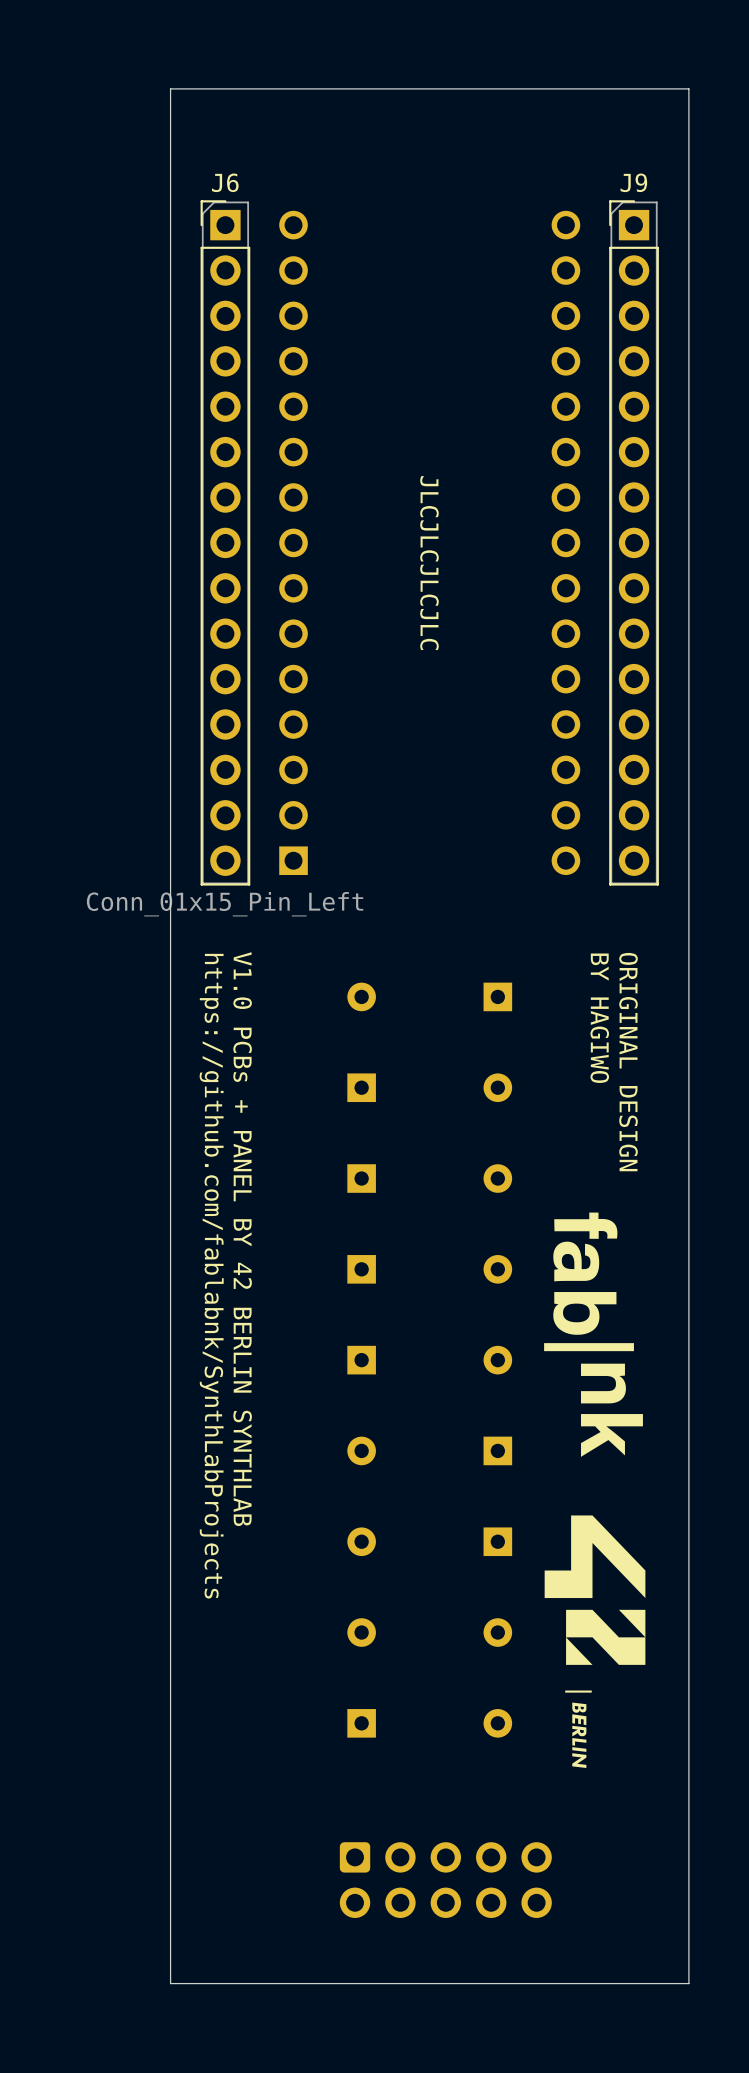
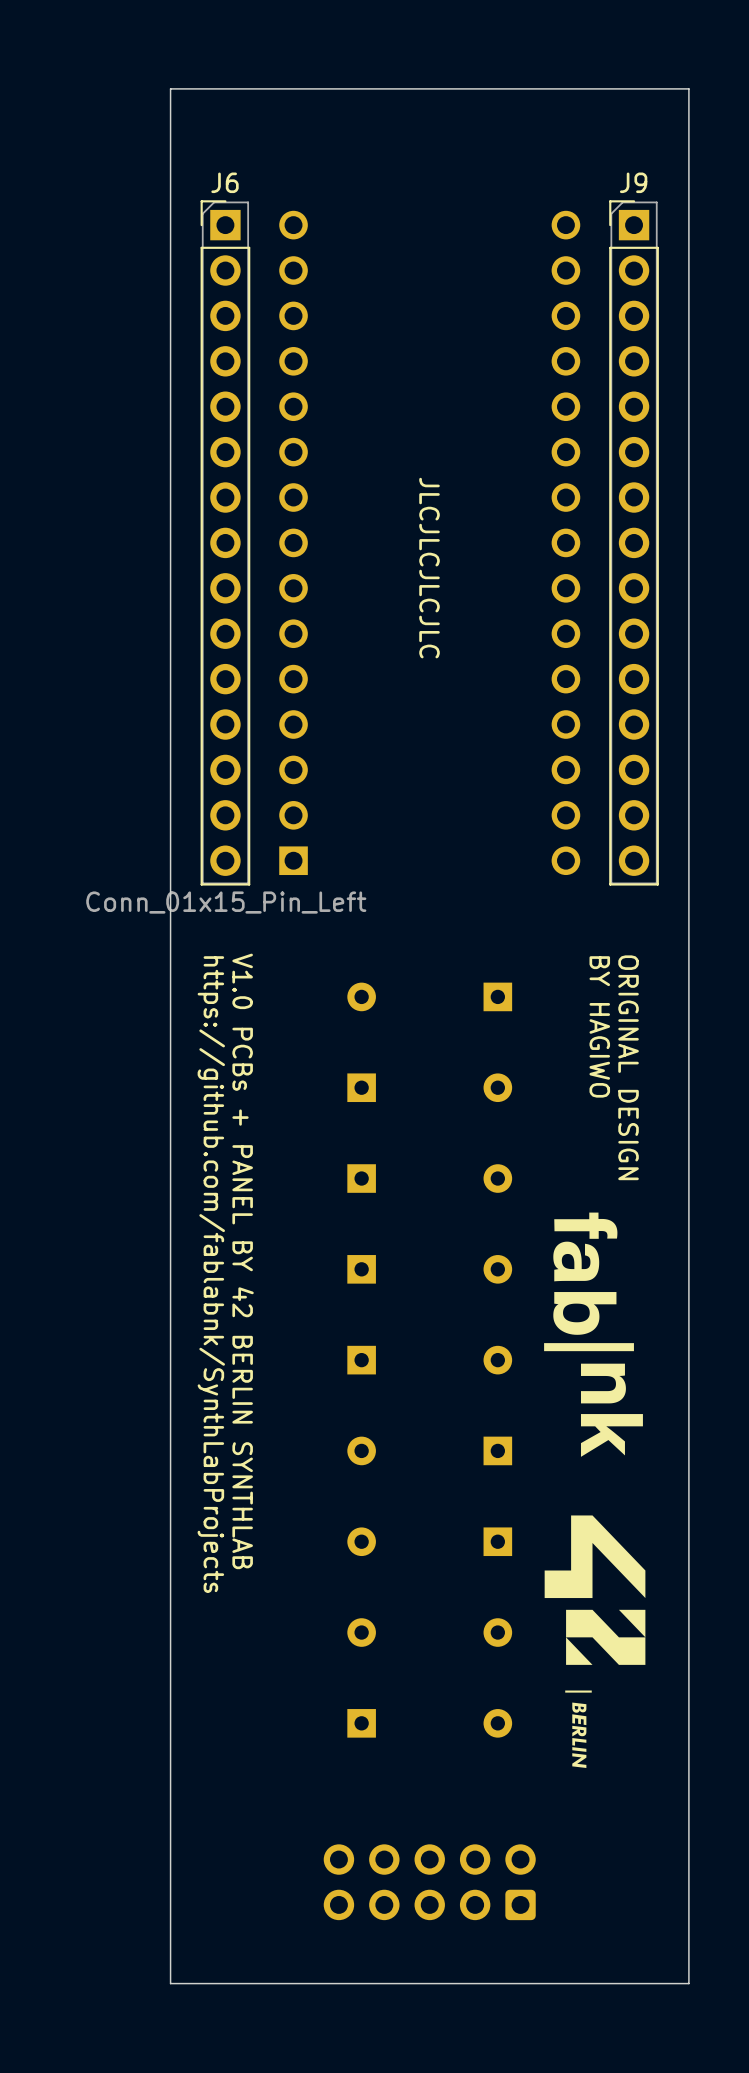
part rotation: 0° (445, 1880) -> 180° (429, 1882)

